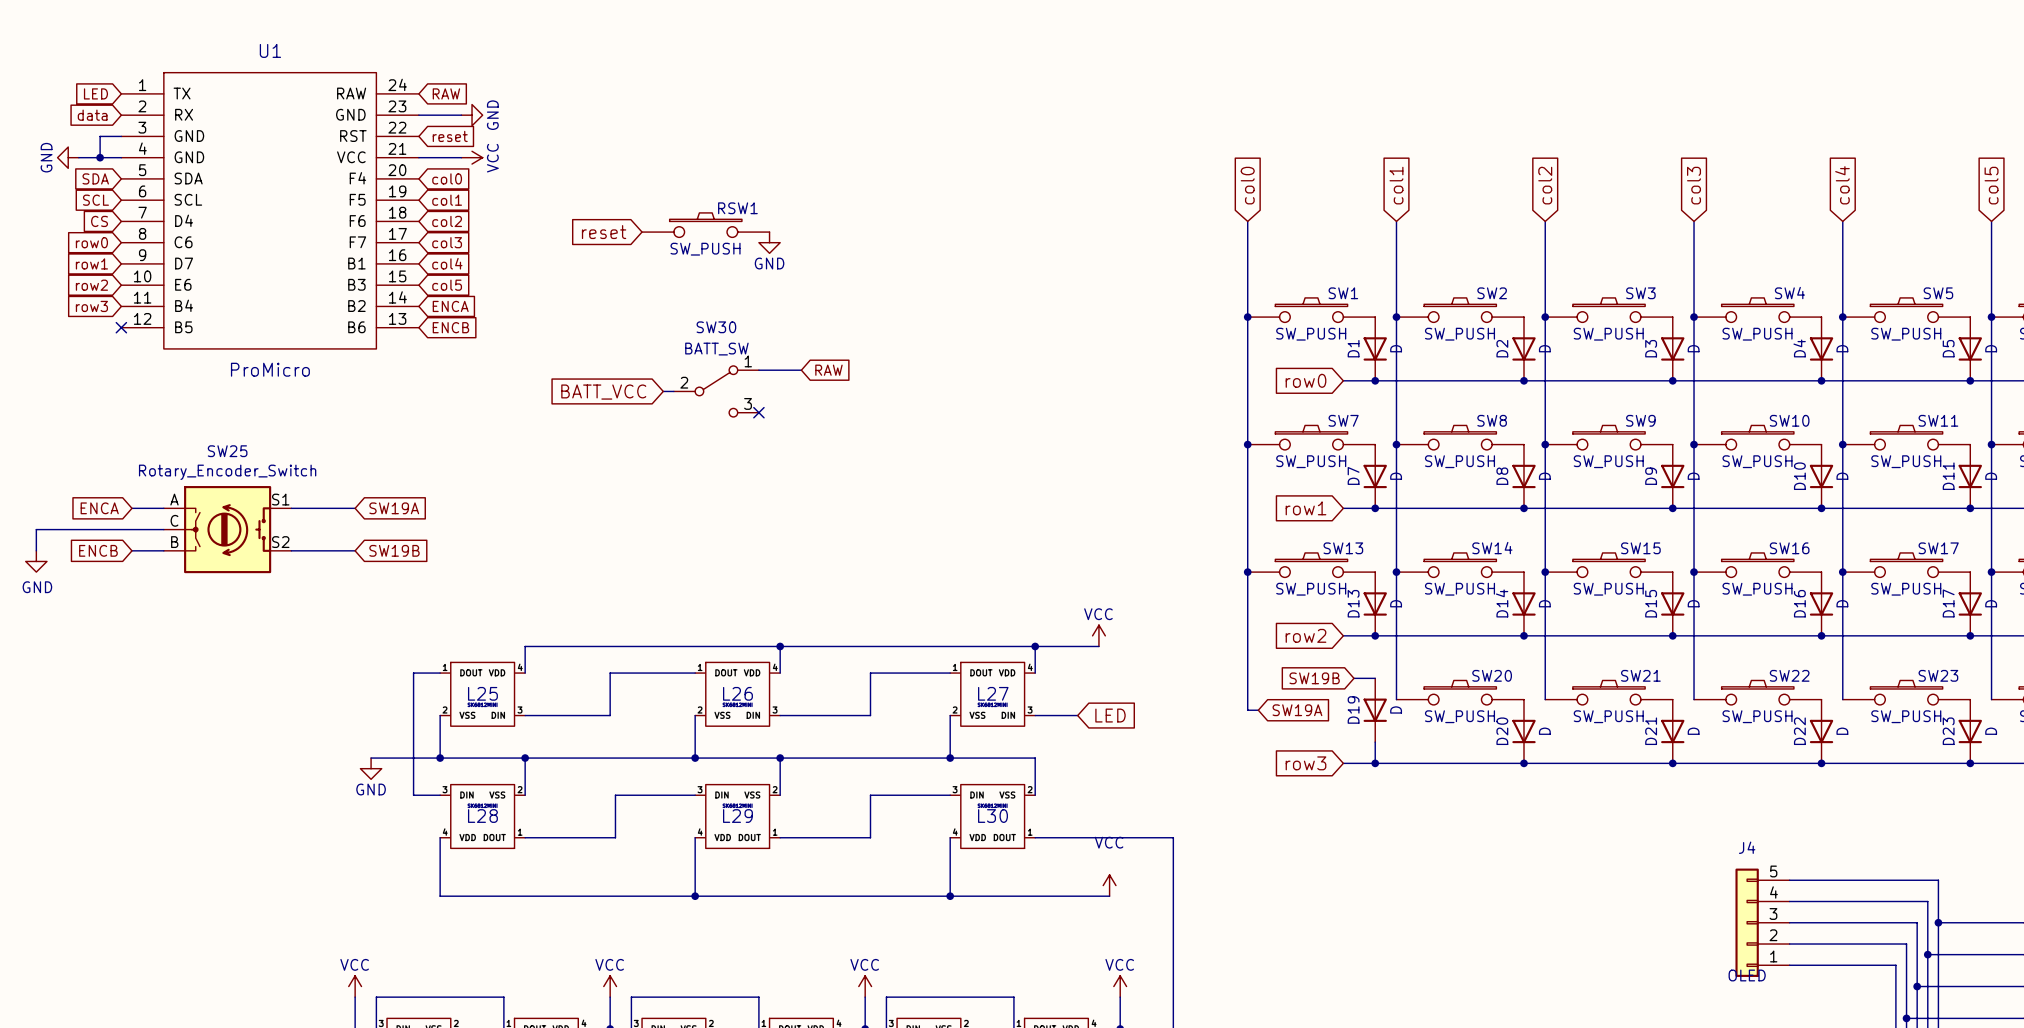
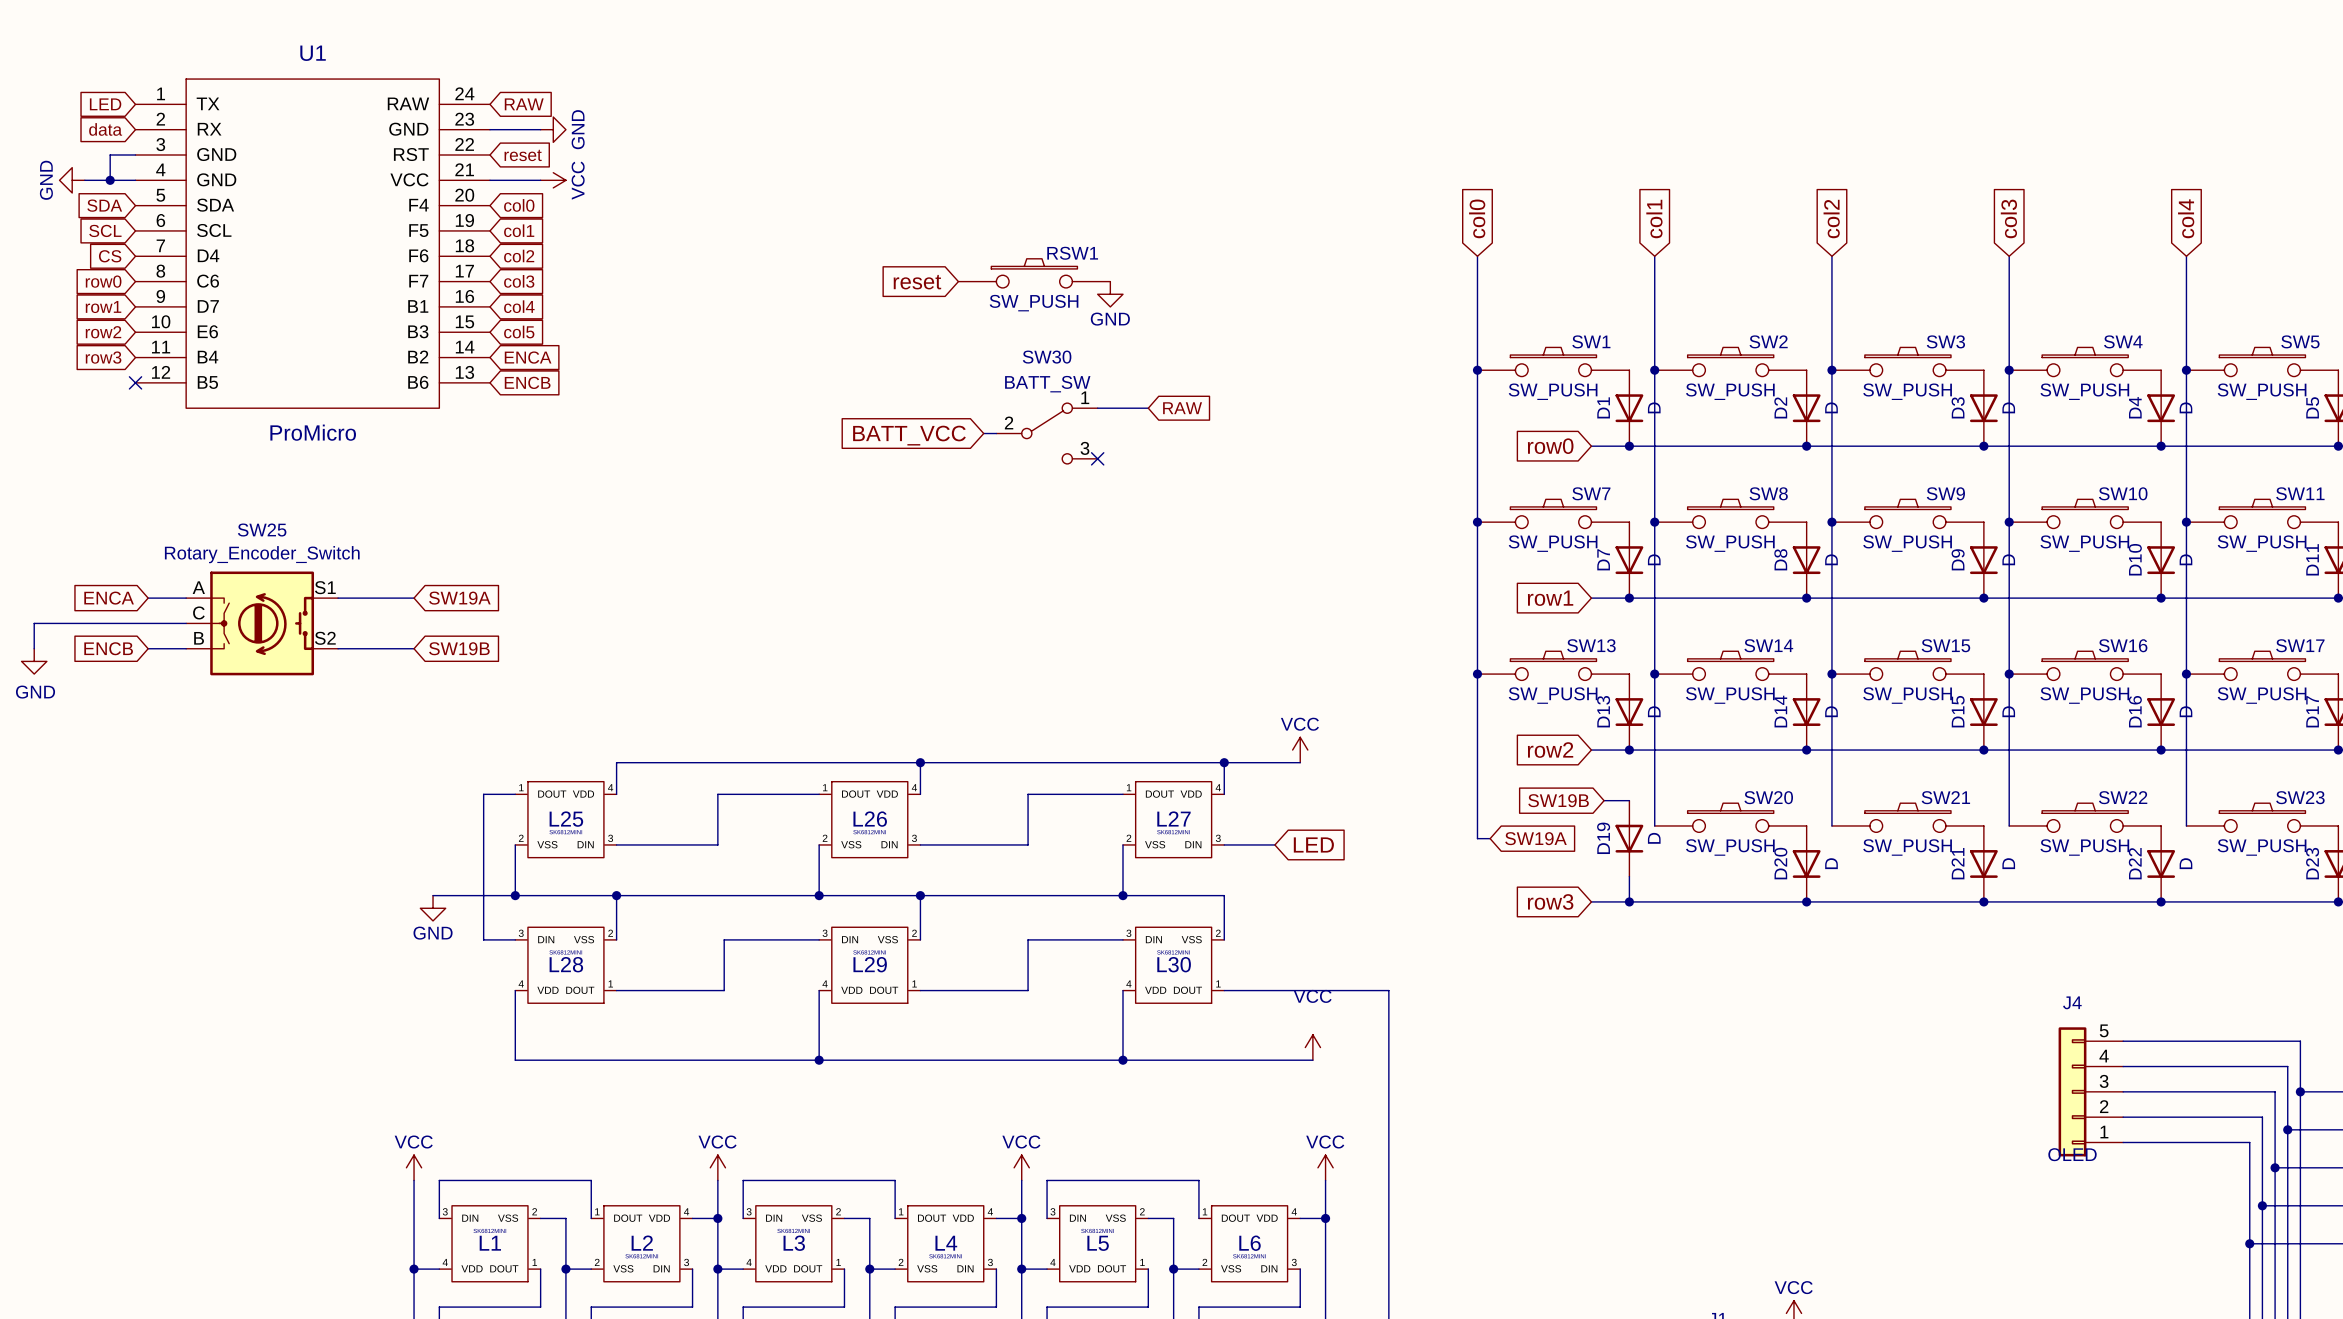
RSW1 position: (705, 225) -> (1034, 273)
global label position: reset (604, 232) -> reset (917, 282)
power symbol position: GND (769, 242) -> GND (1110, 294)
wire: (758, 370) (801, 370) -> (1097, 408) (1148, 408)
global label position: RAW (828, 370) -> RAW (1182, 408)
wire: (663, 391) (673, 391) -> (983, 433) (996, 433)
SW30 position: (716, 391) -> (1047, 433)
no-connect mark: none -> (1097, 458)
global label position: BATT_VCC (603, 392) -> BATT_VCC (909, 435)
no-connect mark: (758, 412) -> none

